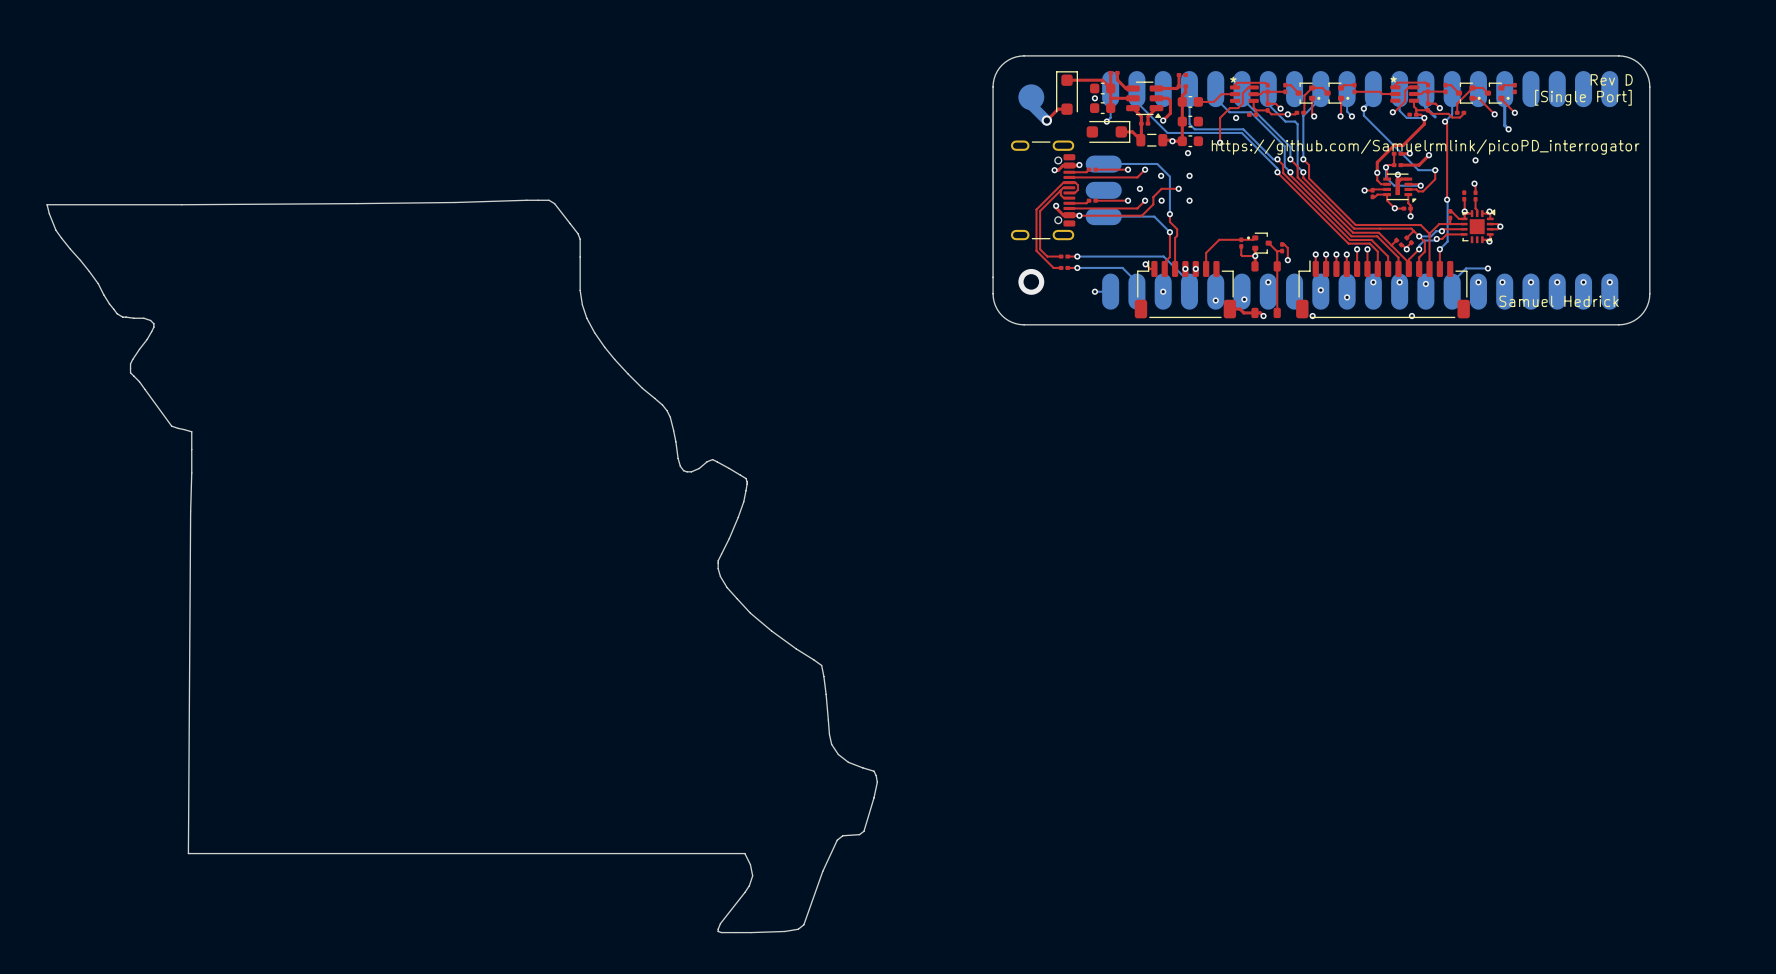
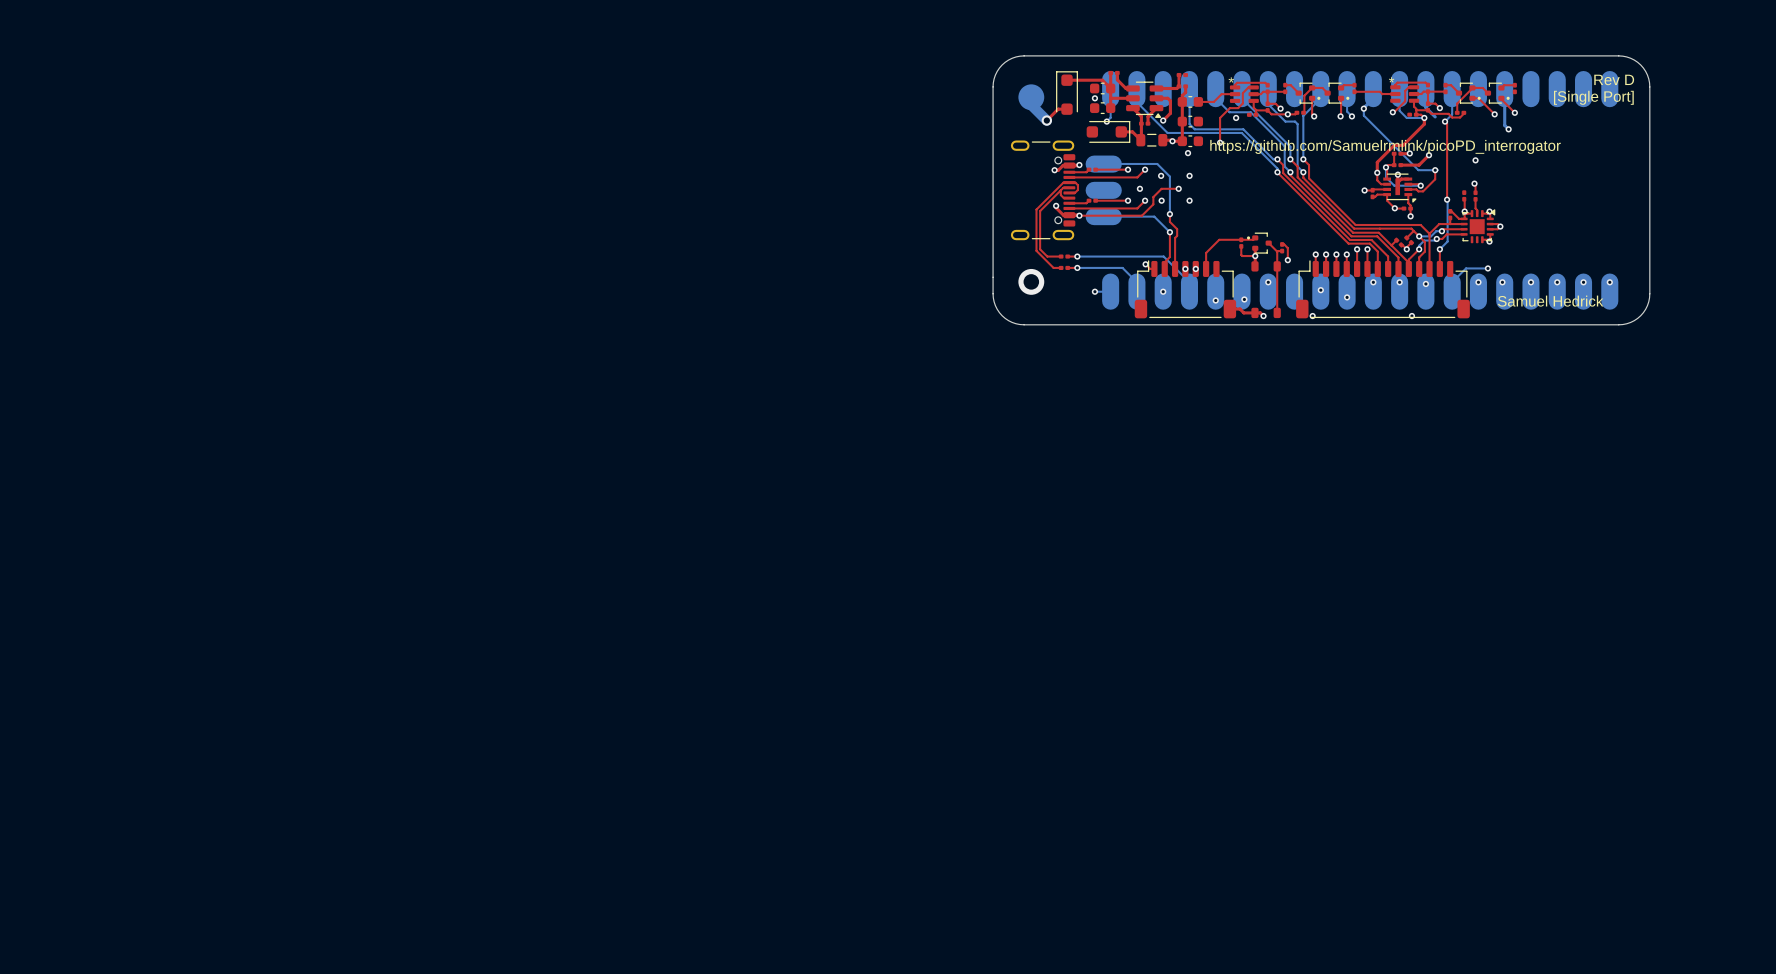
board edge: (526, 200) (357, 203) (47, 204) (55, 230) (89, 271) (117, 313) (122, 317) (143, 318) (153, 323) (147, 339) (130, 363) (130, 372) (139, 381) (171, 426) (191, 431) (188, 853) (744, 853) (750, 864) (752, 875) (749, 885) (720, 923) (718, 931) (751, 932) (798, 929) (803, 924) (822, 871) (837, 840) (842, 835) (859, 834) (863, 831) (873, 797) (877, 782) (876, 775) (873, 771) (848, 762) (838, 754) (831, 744) (821, 665) (771, 630) (750, 613) (727, 587) (720, 576) (718, 560) (743, 501) (747, 484) (745, 478) (712, 459) (691, 471) (683, 470) (678, 458) (673, 430) (666, 410) (614, 359) (594, 332) (586, 318) (580, 290) (580, 239) (577, 233) (554, 203) (549, 200) (526, 200) -> none

